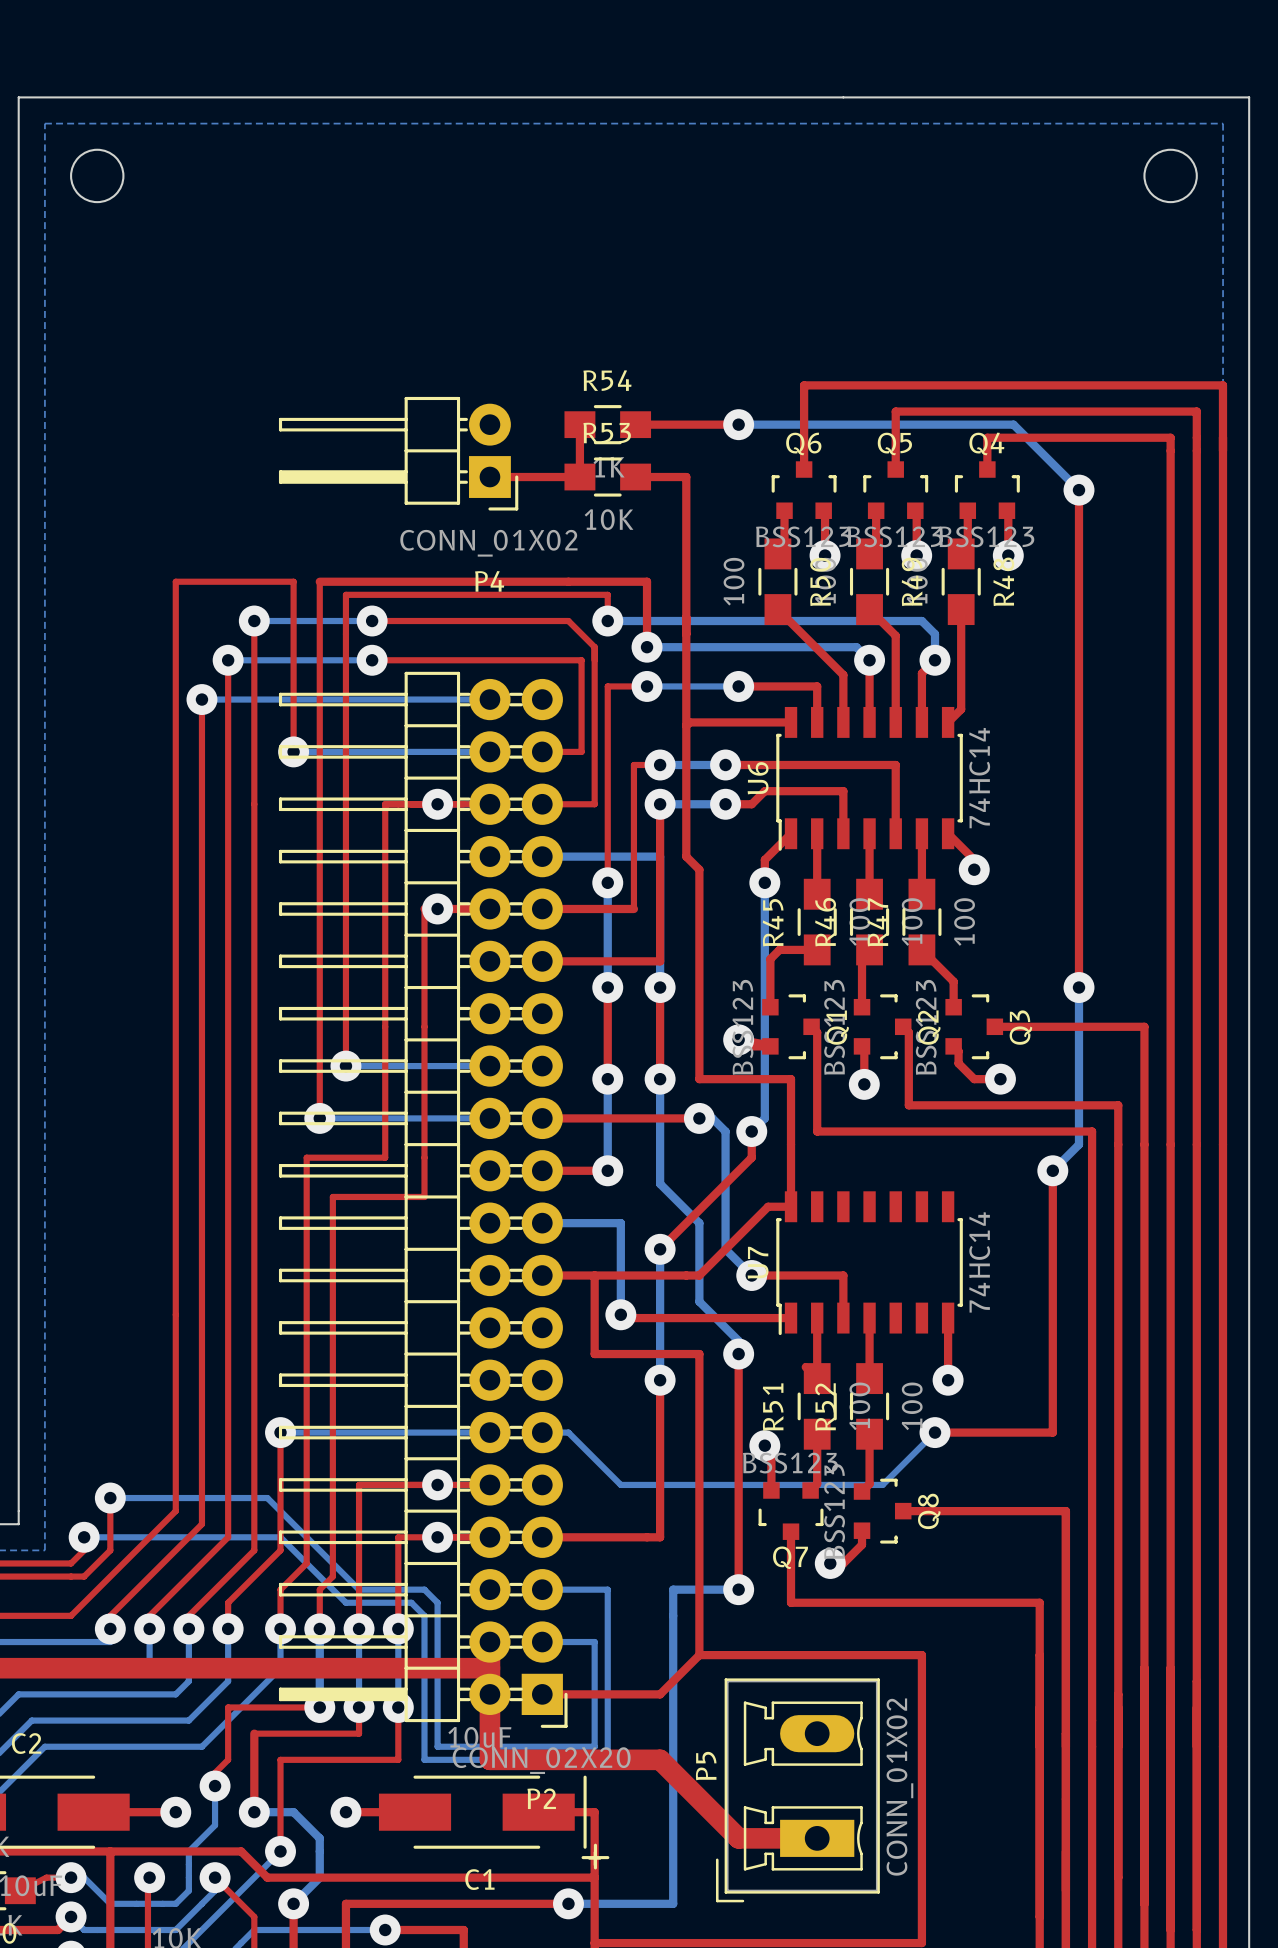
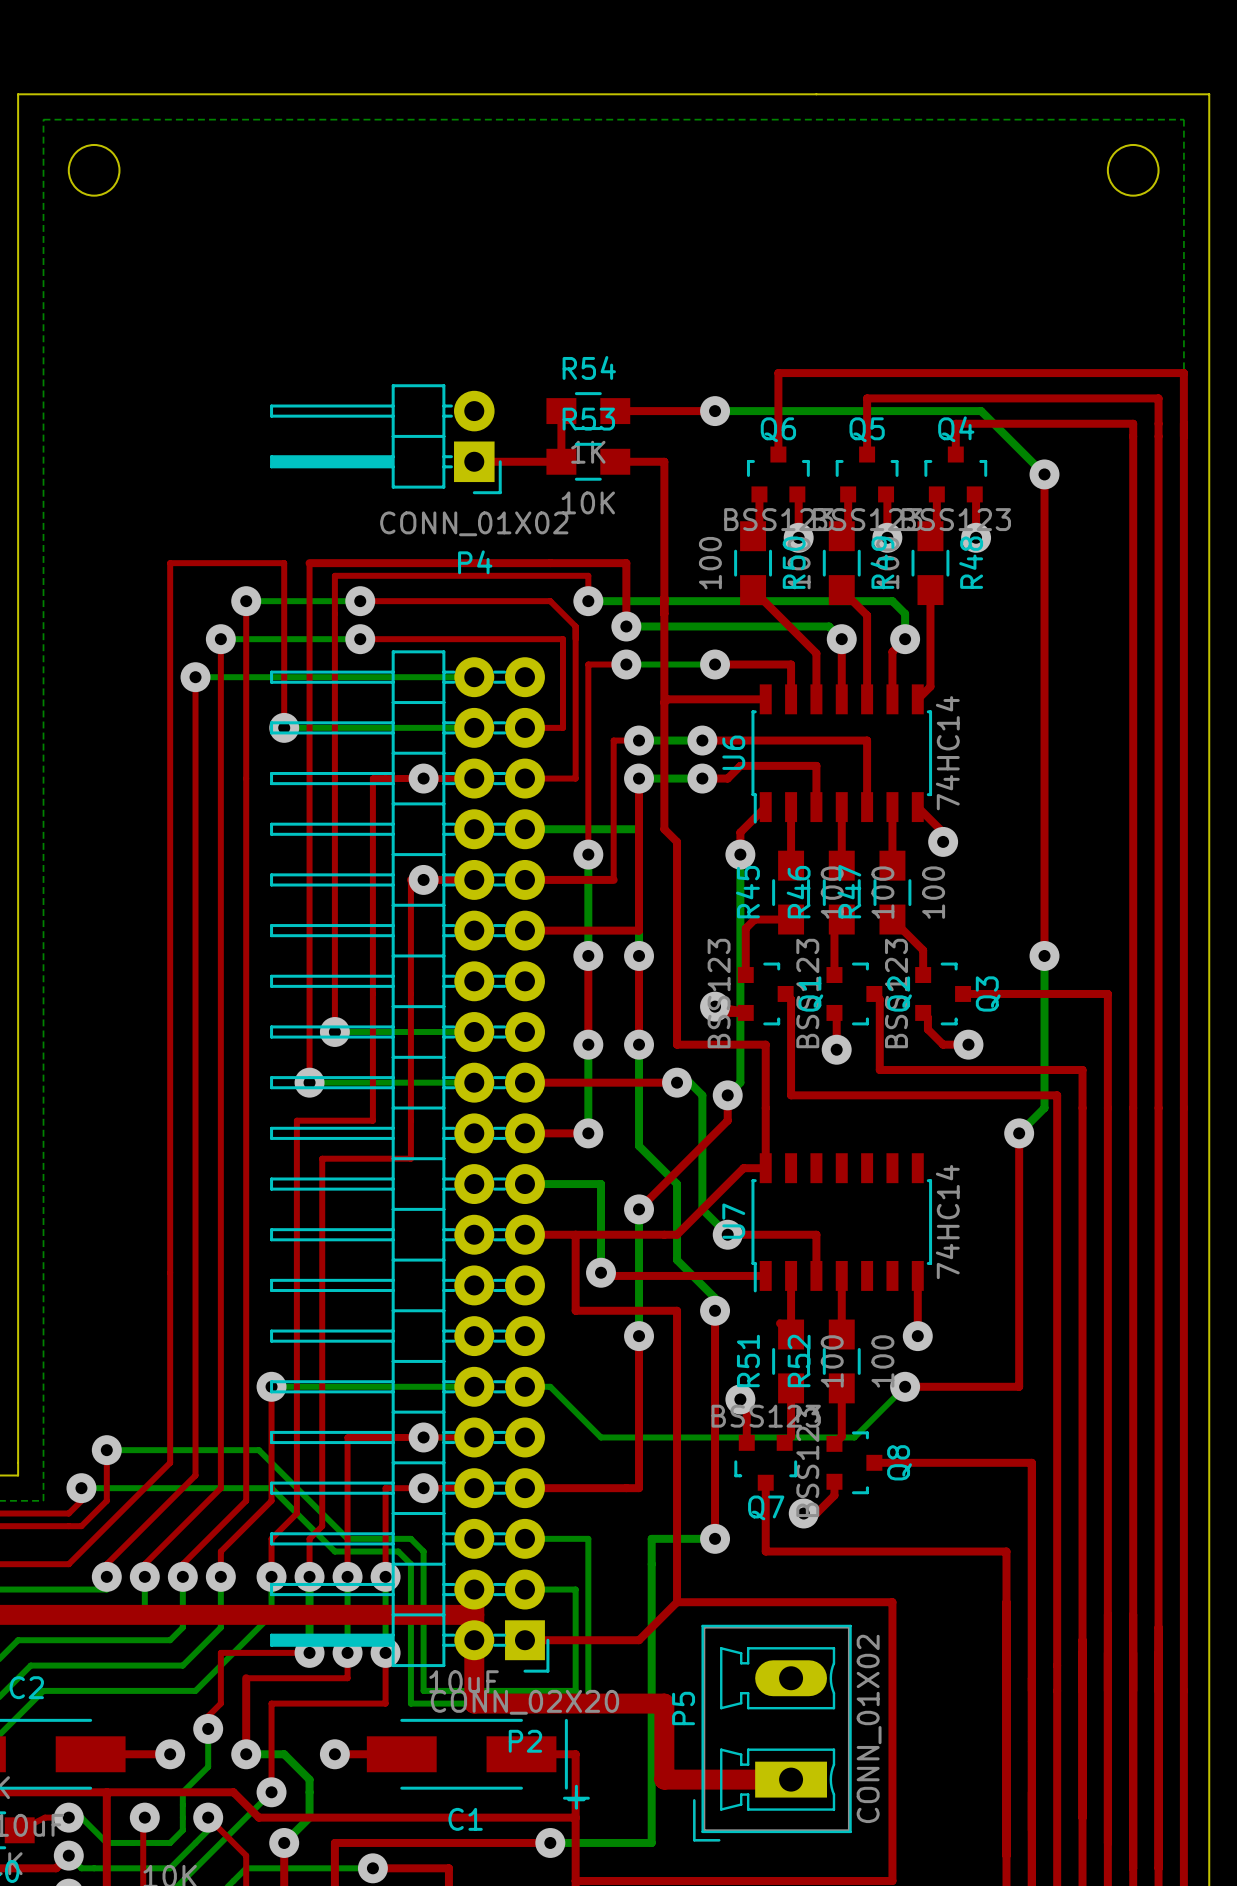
top track: (660, 1759) (738, 1838) -> (639, 1703) (664, 1703) (664, 1779) (715, 1779)

